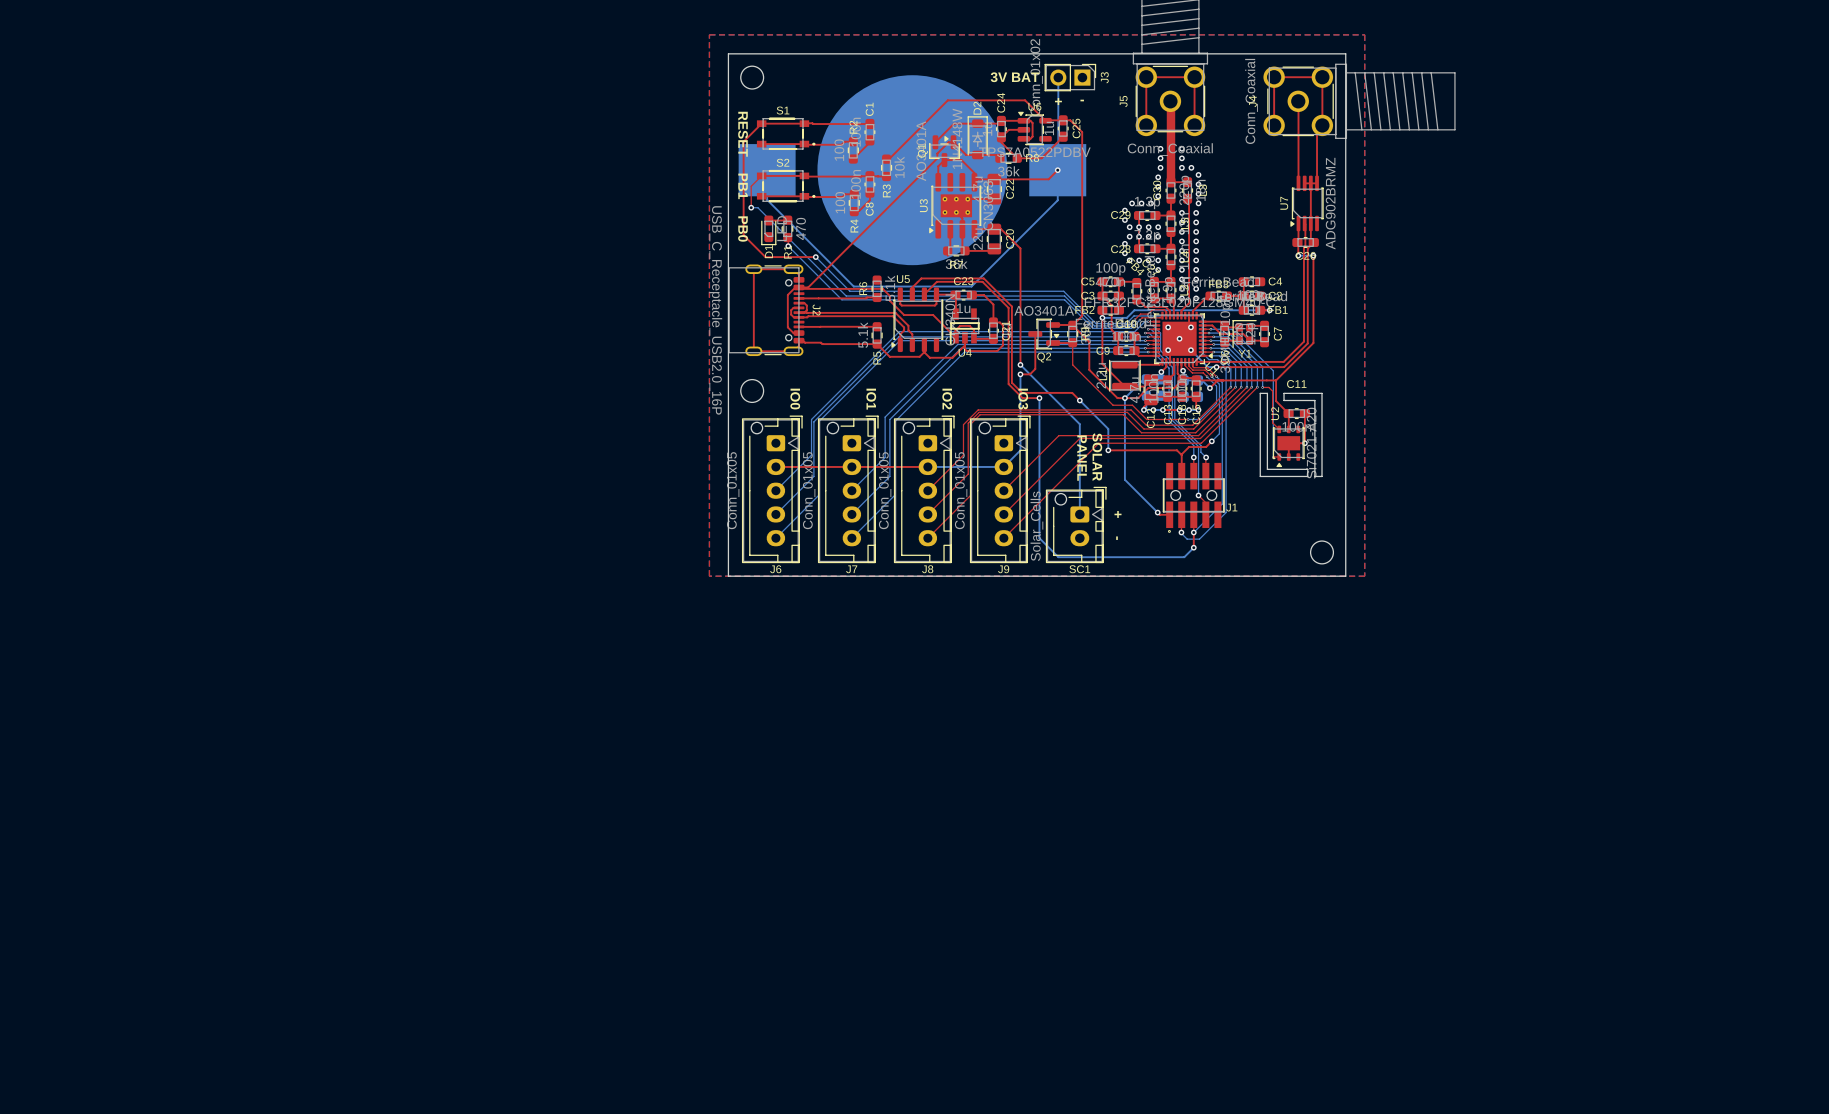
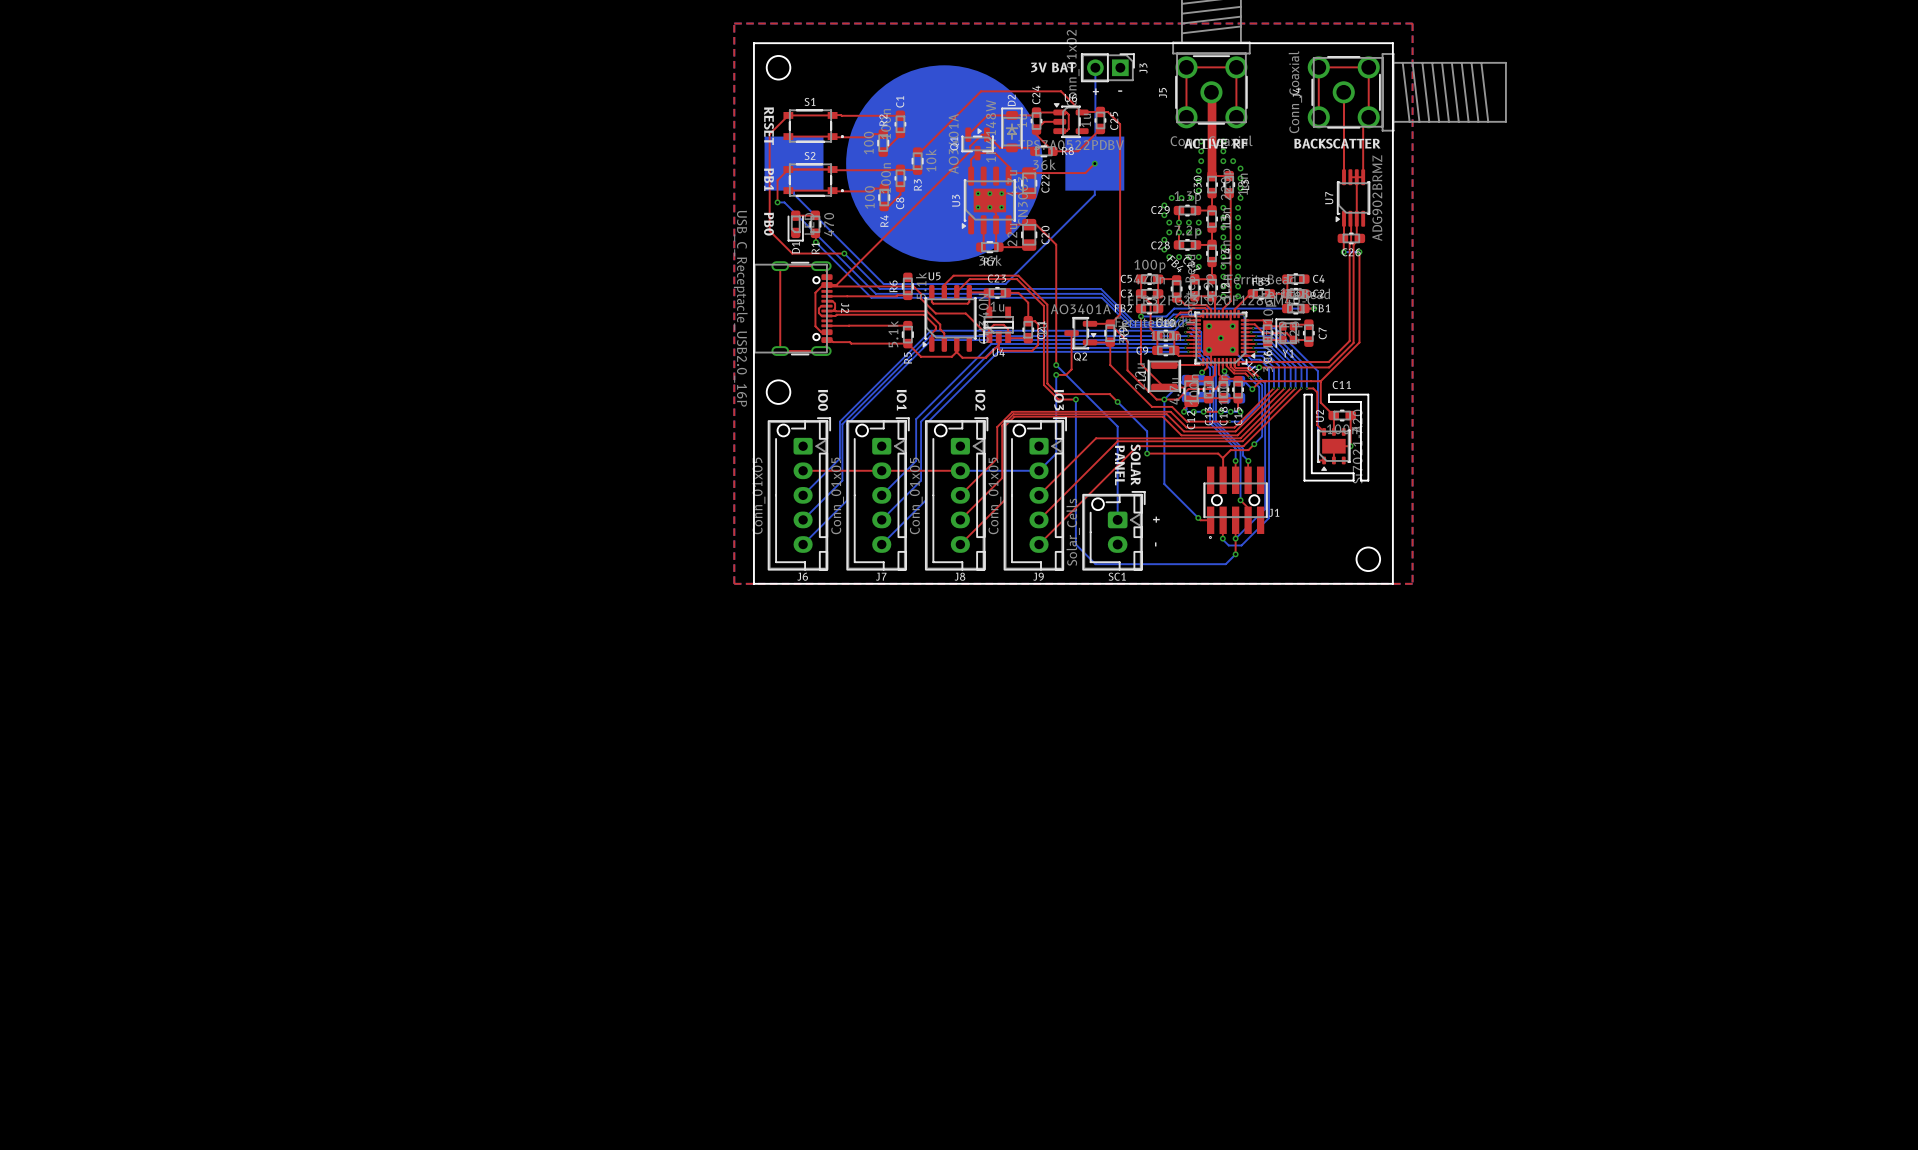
text: none -> ACTIVE RF (1216, 143)
text: none -> BACKSCATTER (1337, 143)

